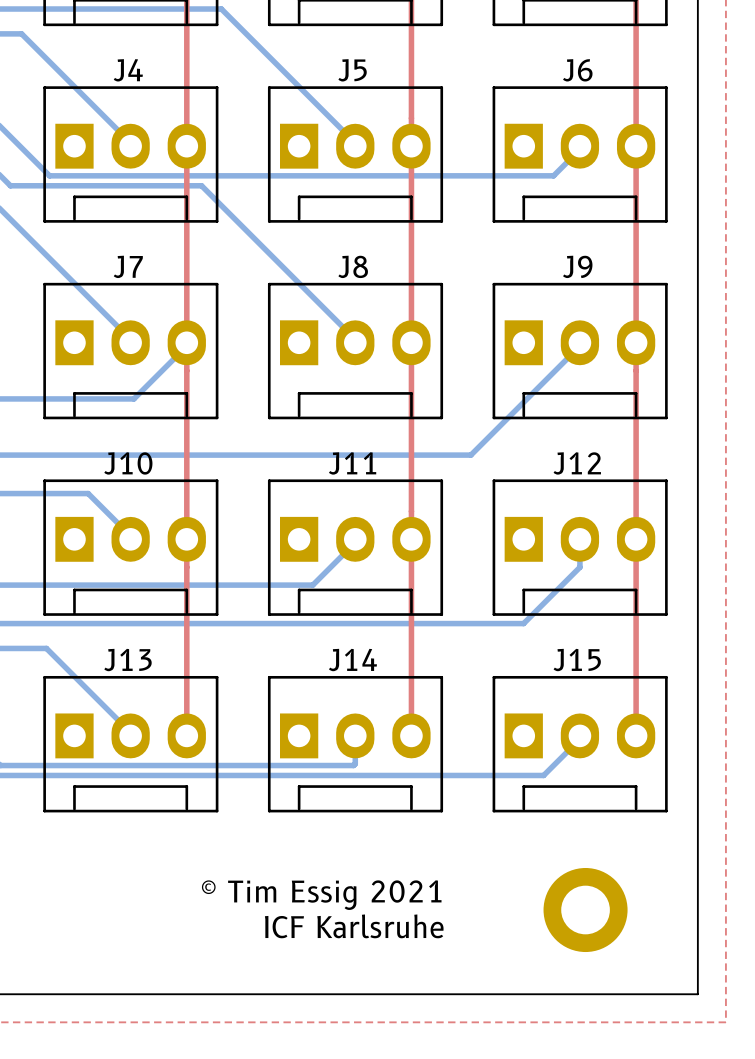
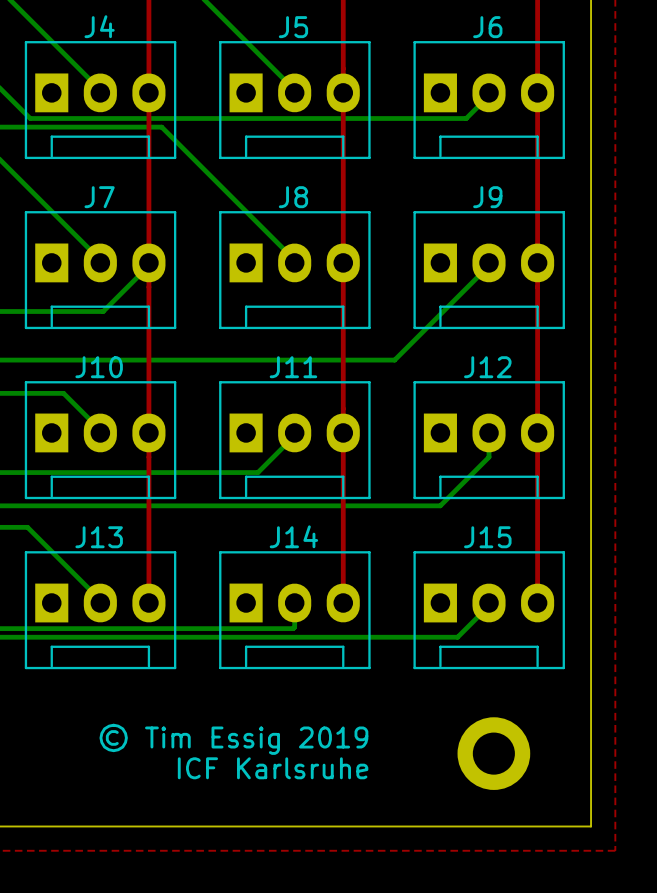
text: © Tim Essig 2021 (321, 895) -> © Tim Essig 2019 (233, 739)

